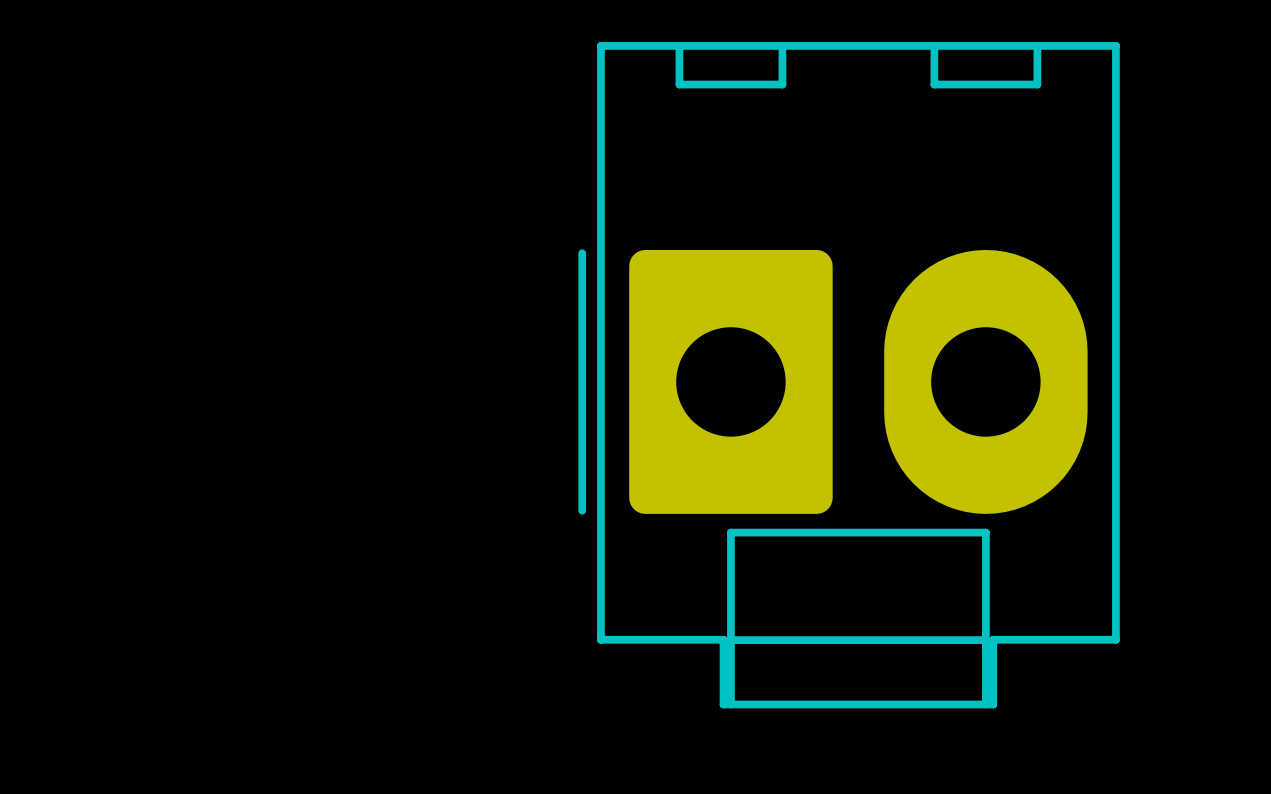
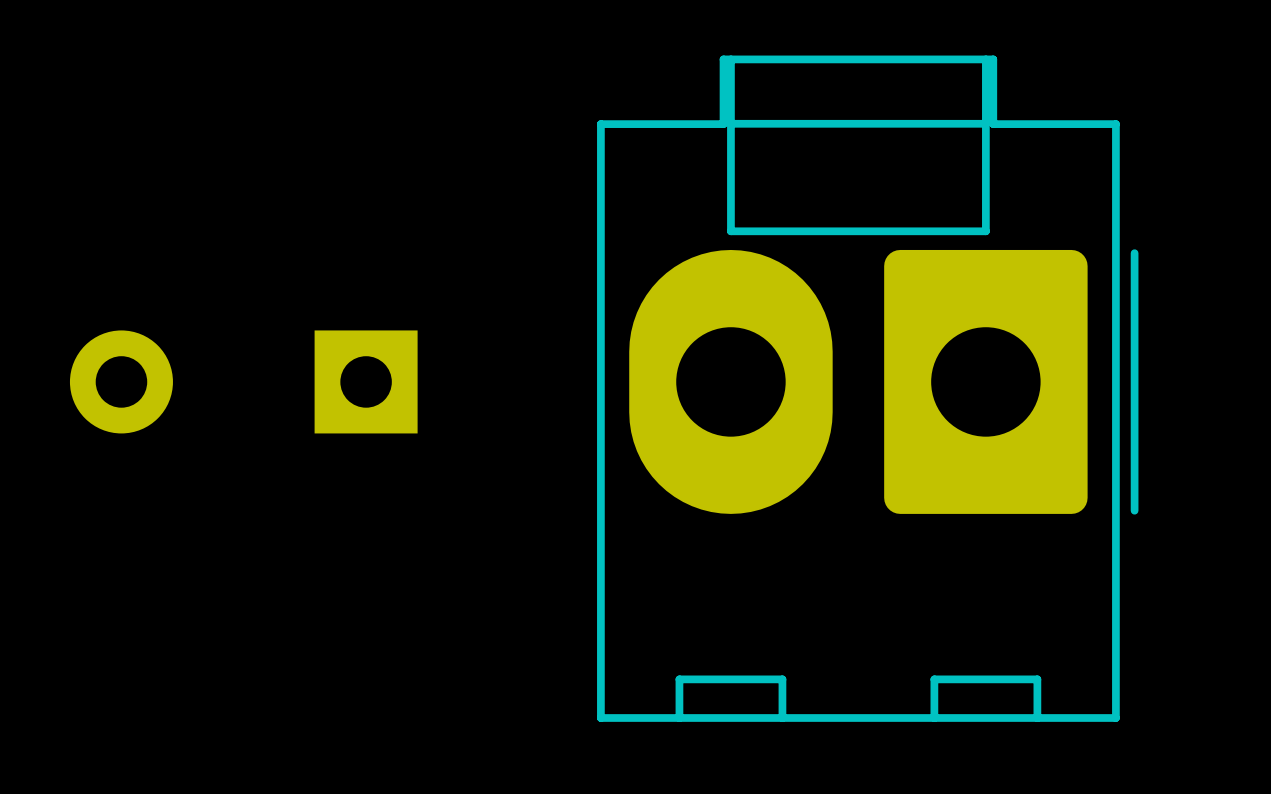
part rotation: 0° (849, 375) -> 180° (867, 388)
part: none -> (243, 381)

